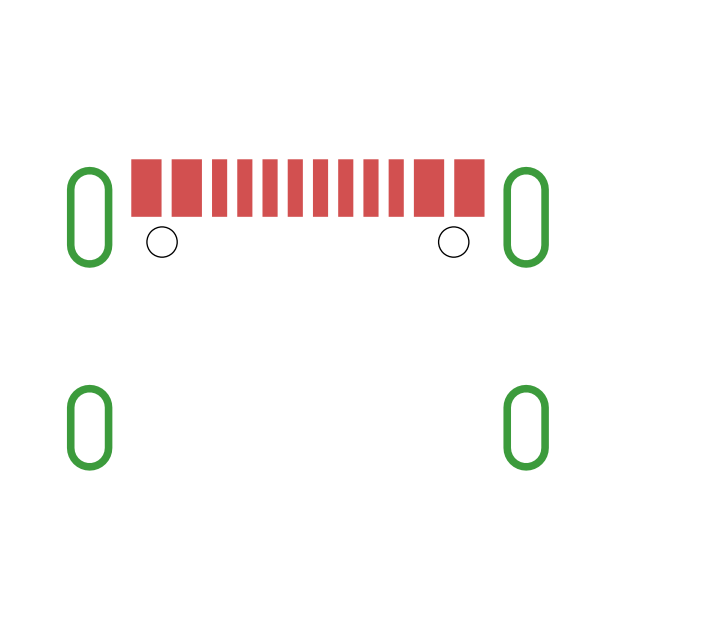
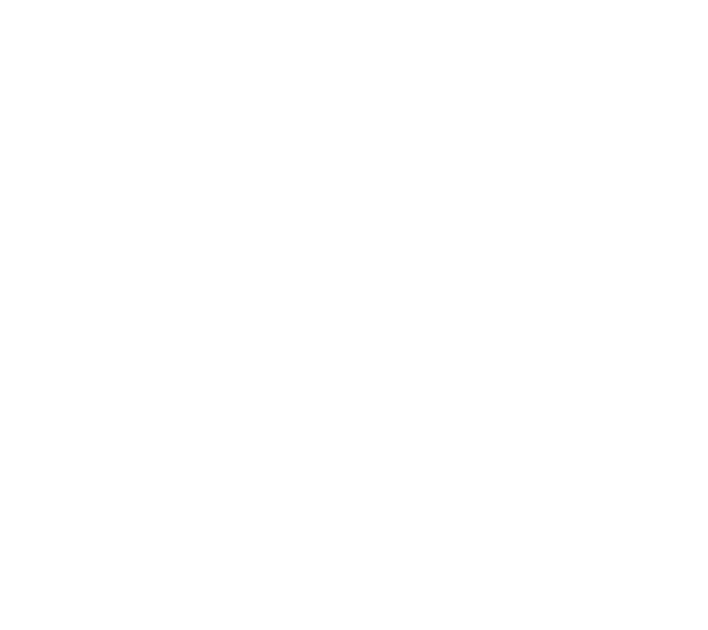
part: (307, 314) -> none

